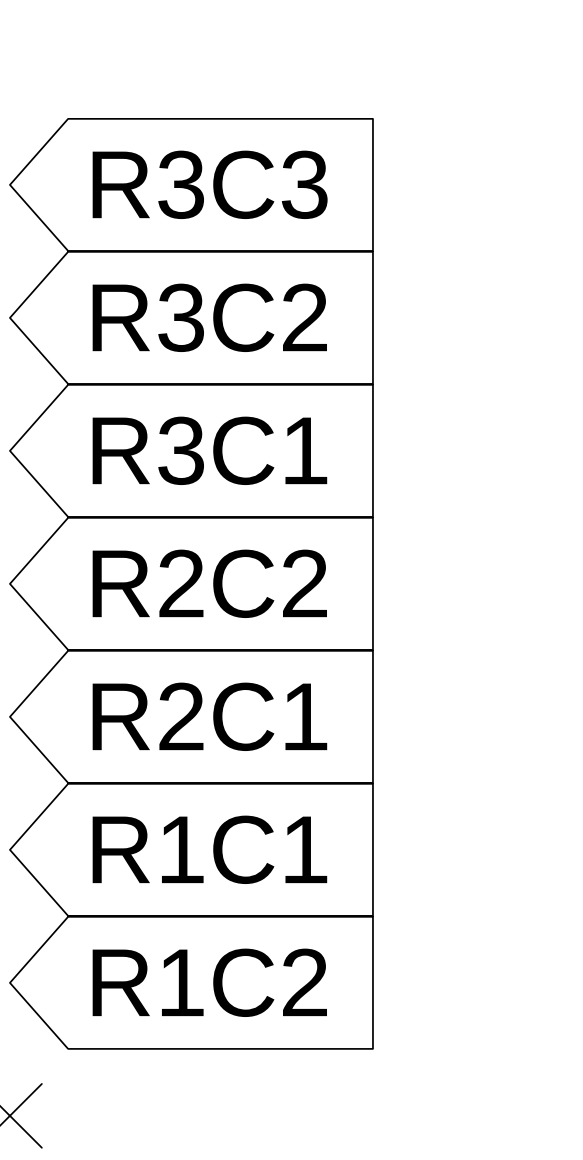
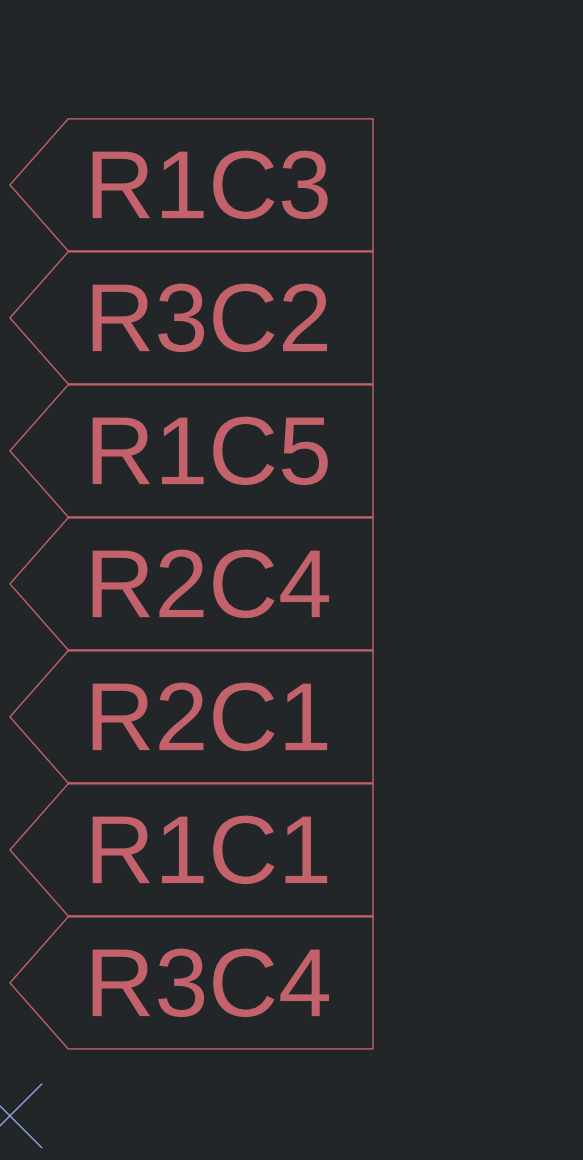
global label: R3C3 (210, 184) -> R1C3 (210, 184)
global label: R3C1 (209, 450) -> R1C5 (210, 450)
global label: R2C2 (209, 583) -> R2C4 (210, 583)
global label: R1C2 (209, 982) -> R3C4 (210, 982)

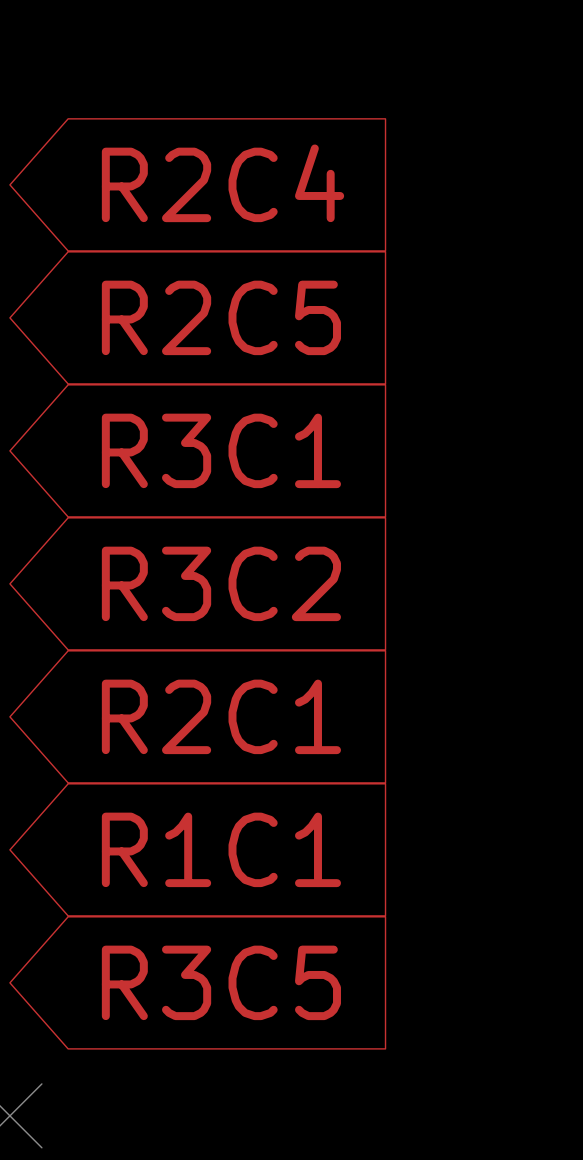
global label: R1C3 (210, 184) -> R2C4 (223, 183)
global label: R3C2 (209, 317) -> R2C5 (221, 317)
global label: R1C5 (210, 450) -> R3C1 (221, 450)
global label: R2C4 (210, 583) -> R3C2 (221, 583)
global label: R3C4 (210, 982) -> R3C5 (221, 982)

